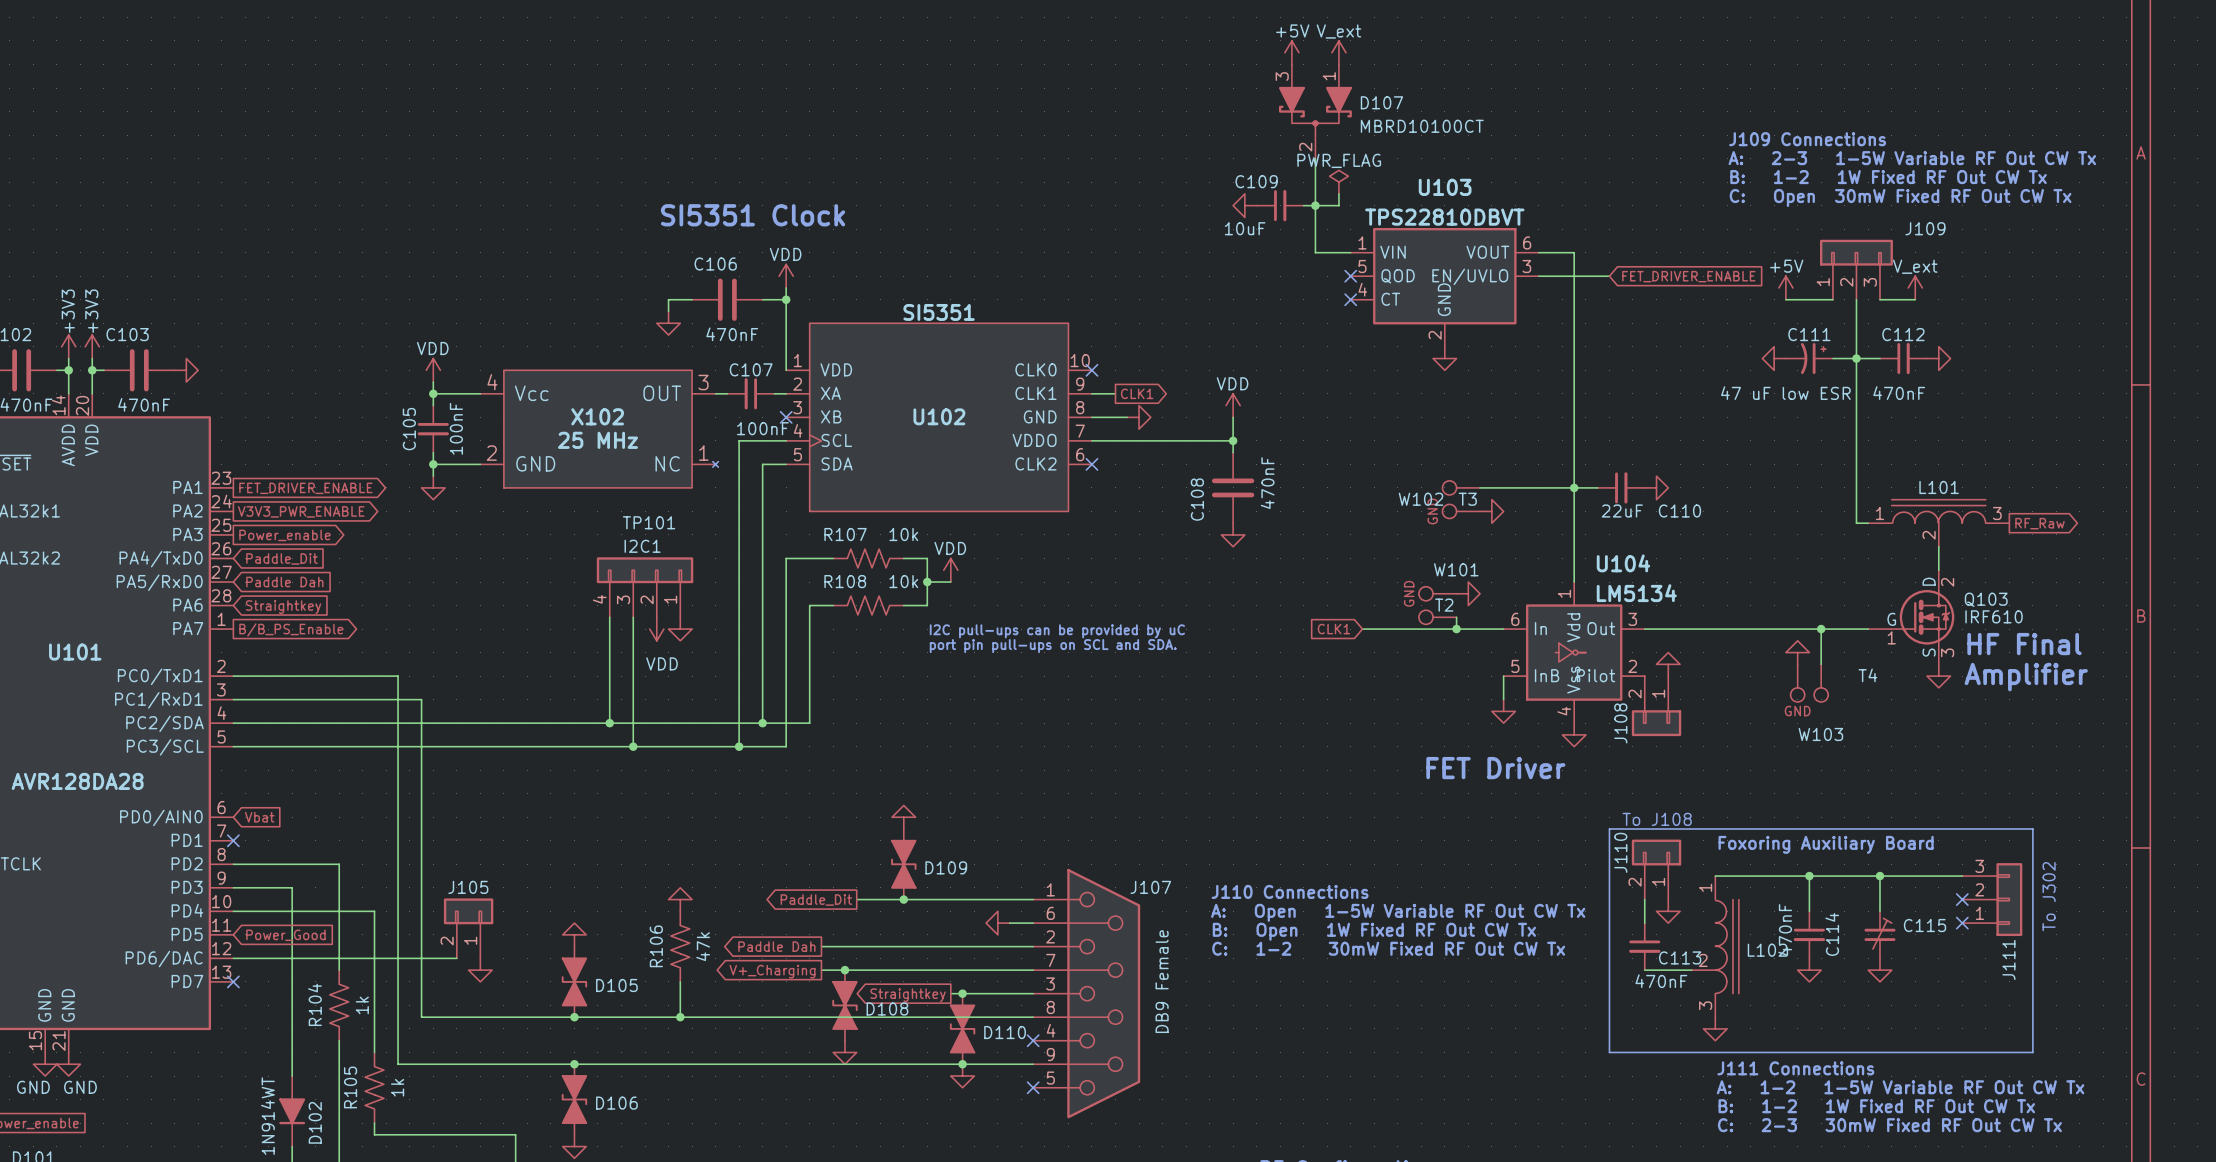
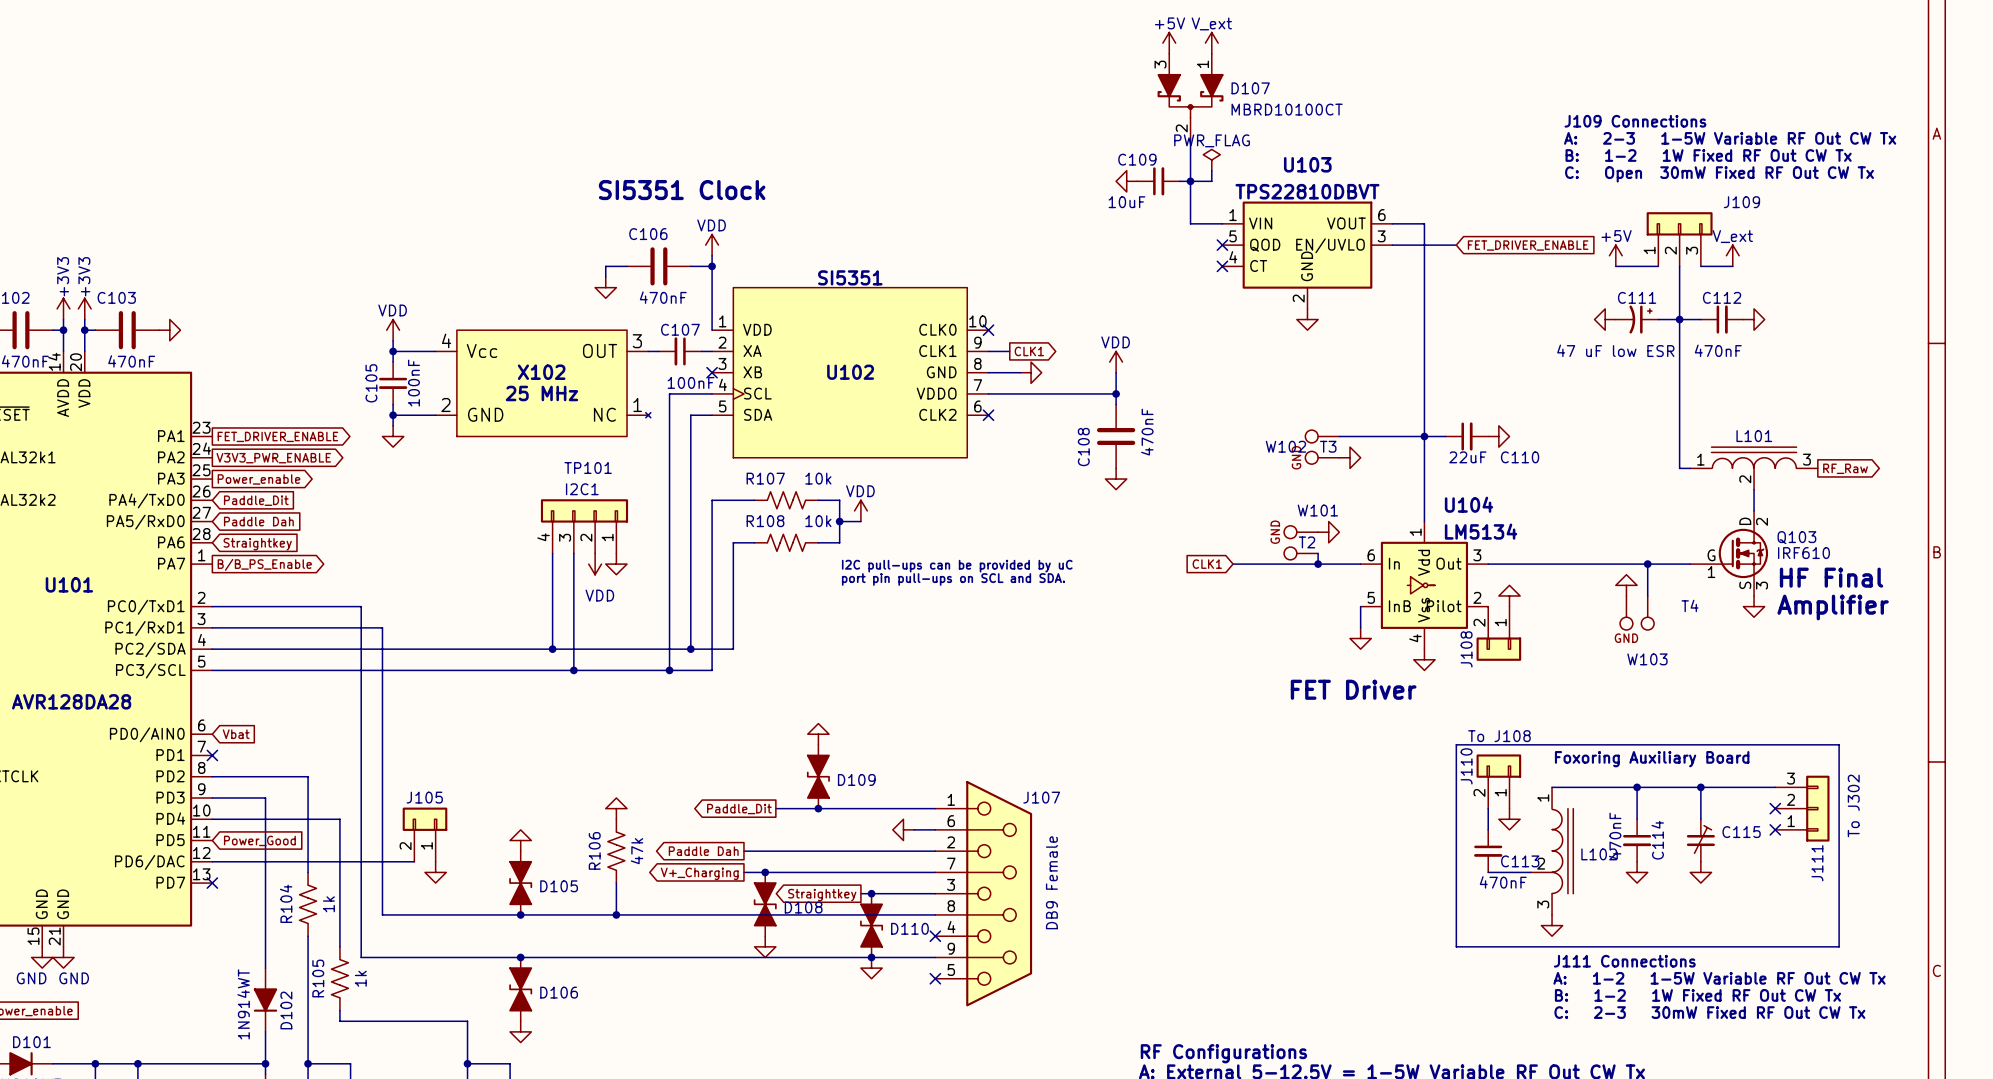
text: J110 Connections (1290, 891) -> none
text: A: Open 1-5W Variable RF Out CW Tx (1398, 912) -> none
text: B: Open 1W Fixed RF Out CW Tx (1374, 931) -> none
text: C: 1-2 30mW Fixed RF Out CW Tx (1388, 948) -> none

